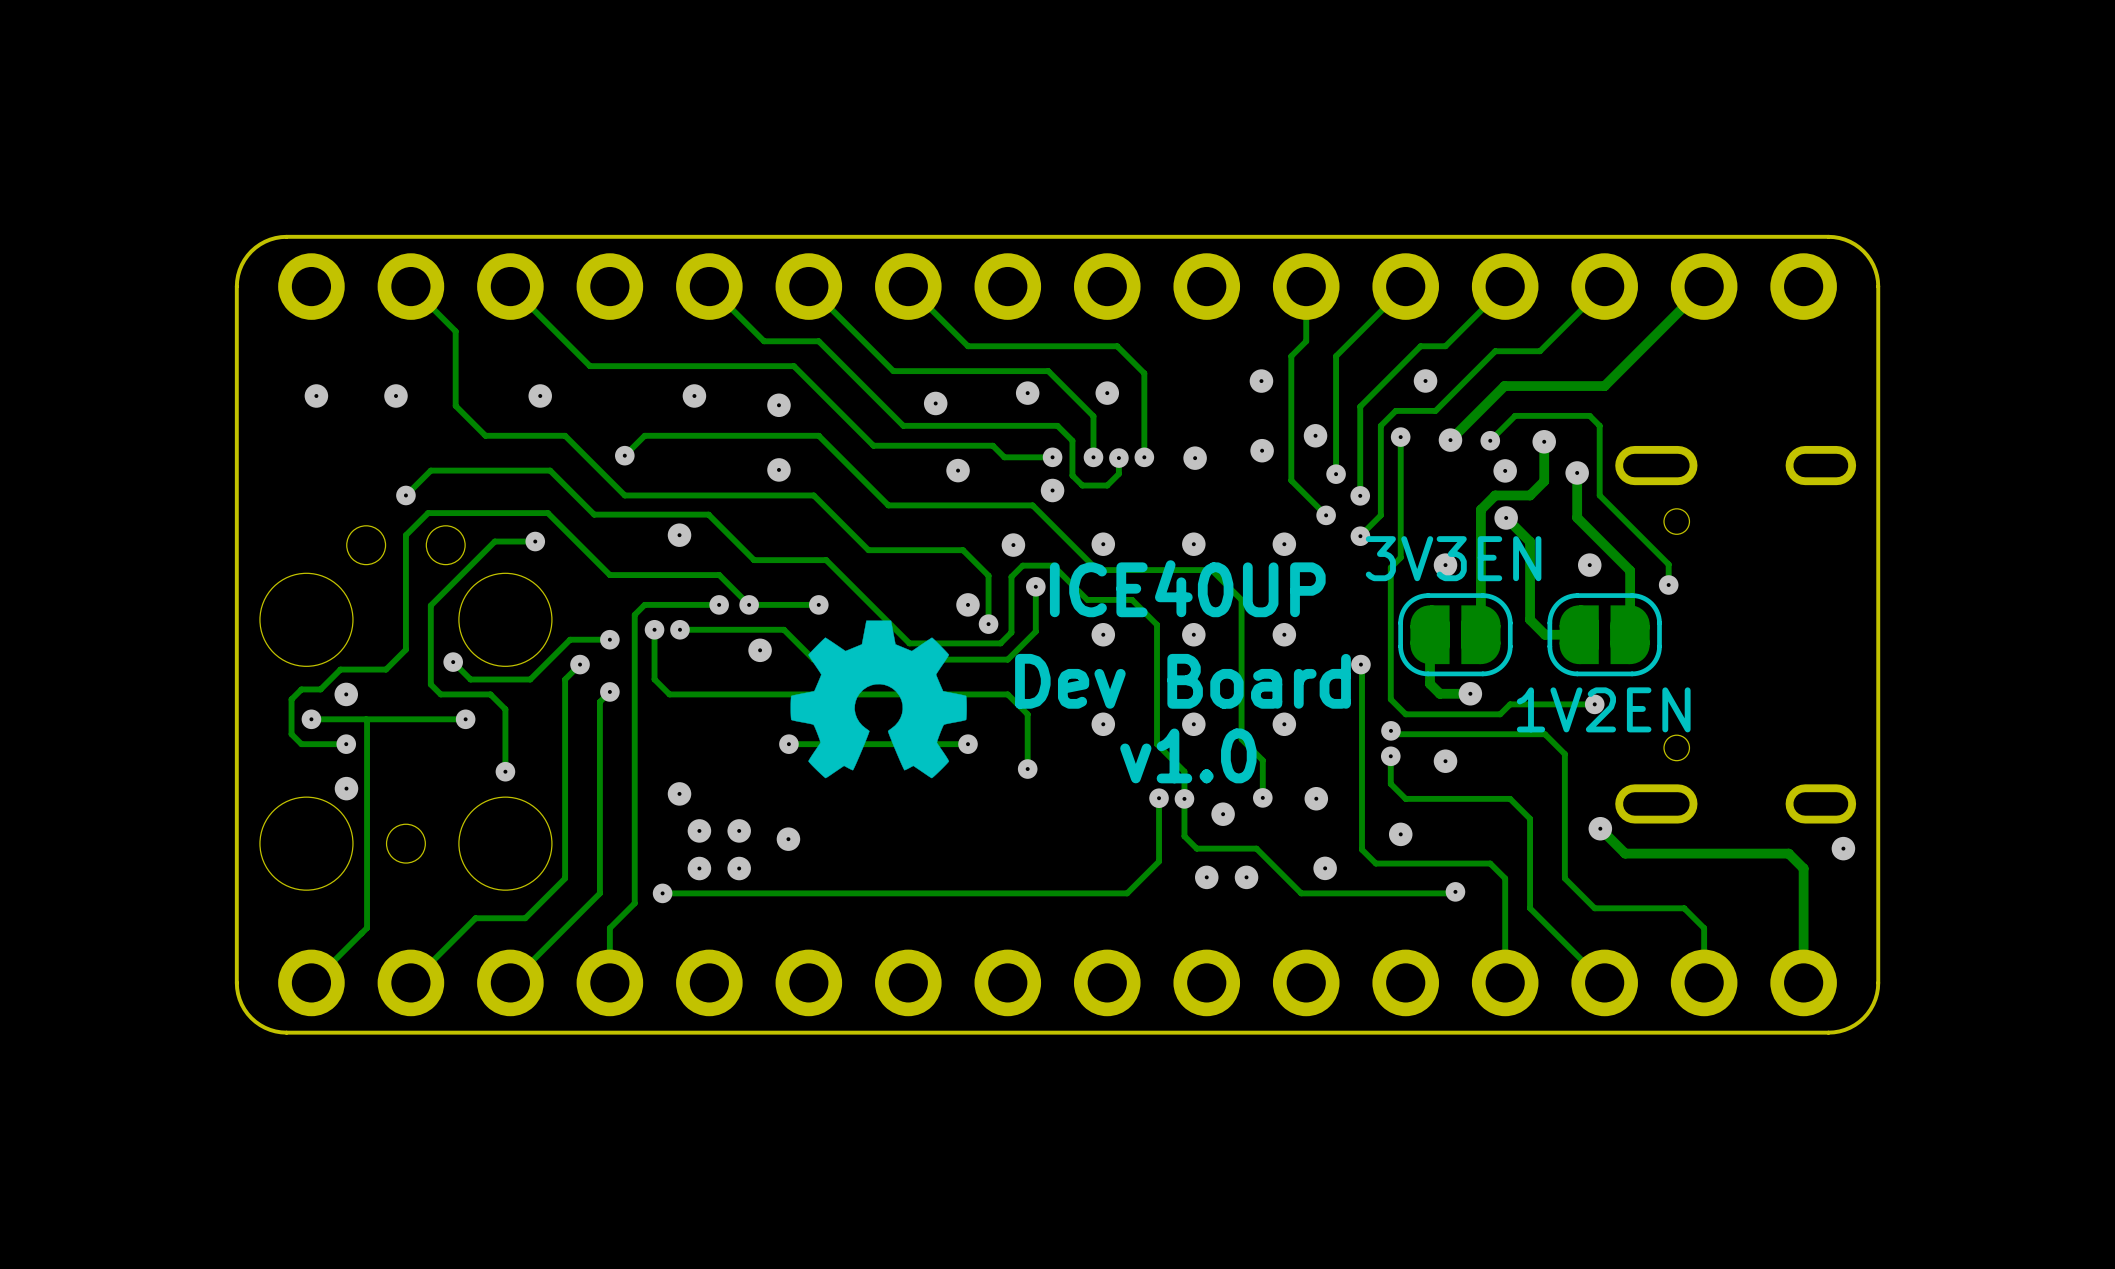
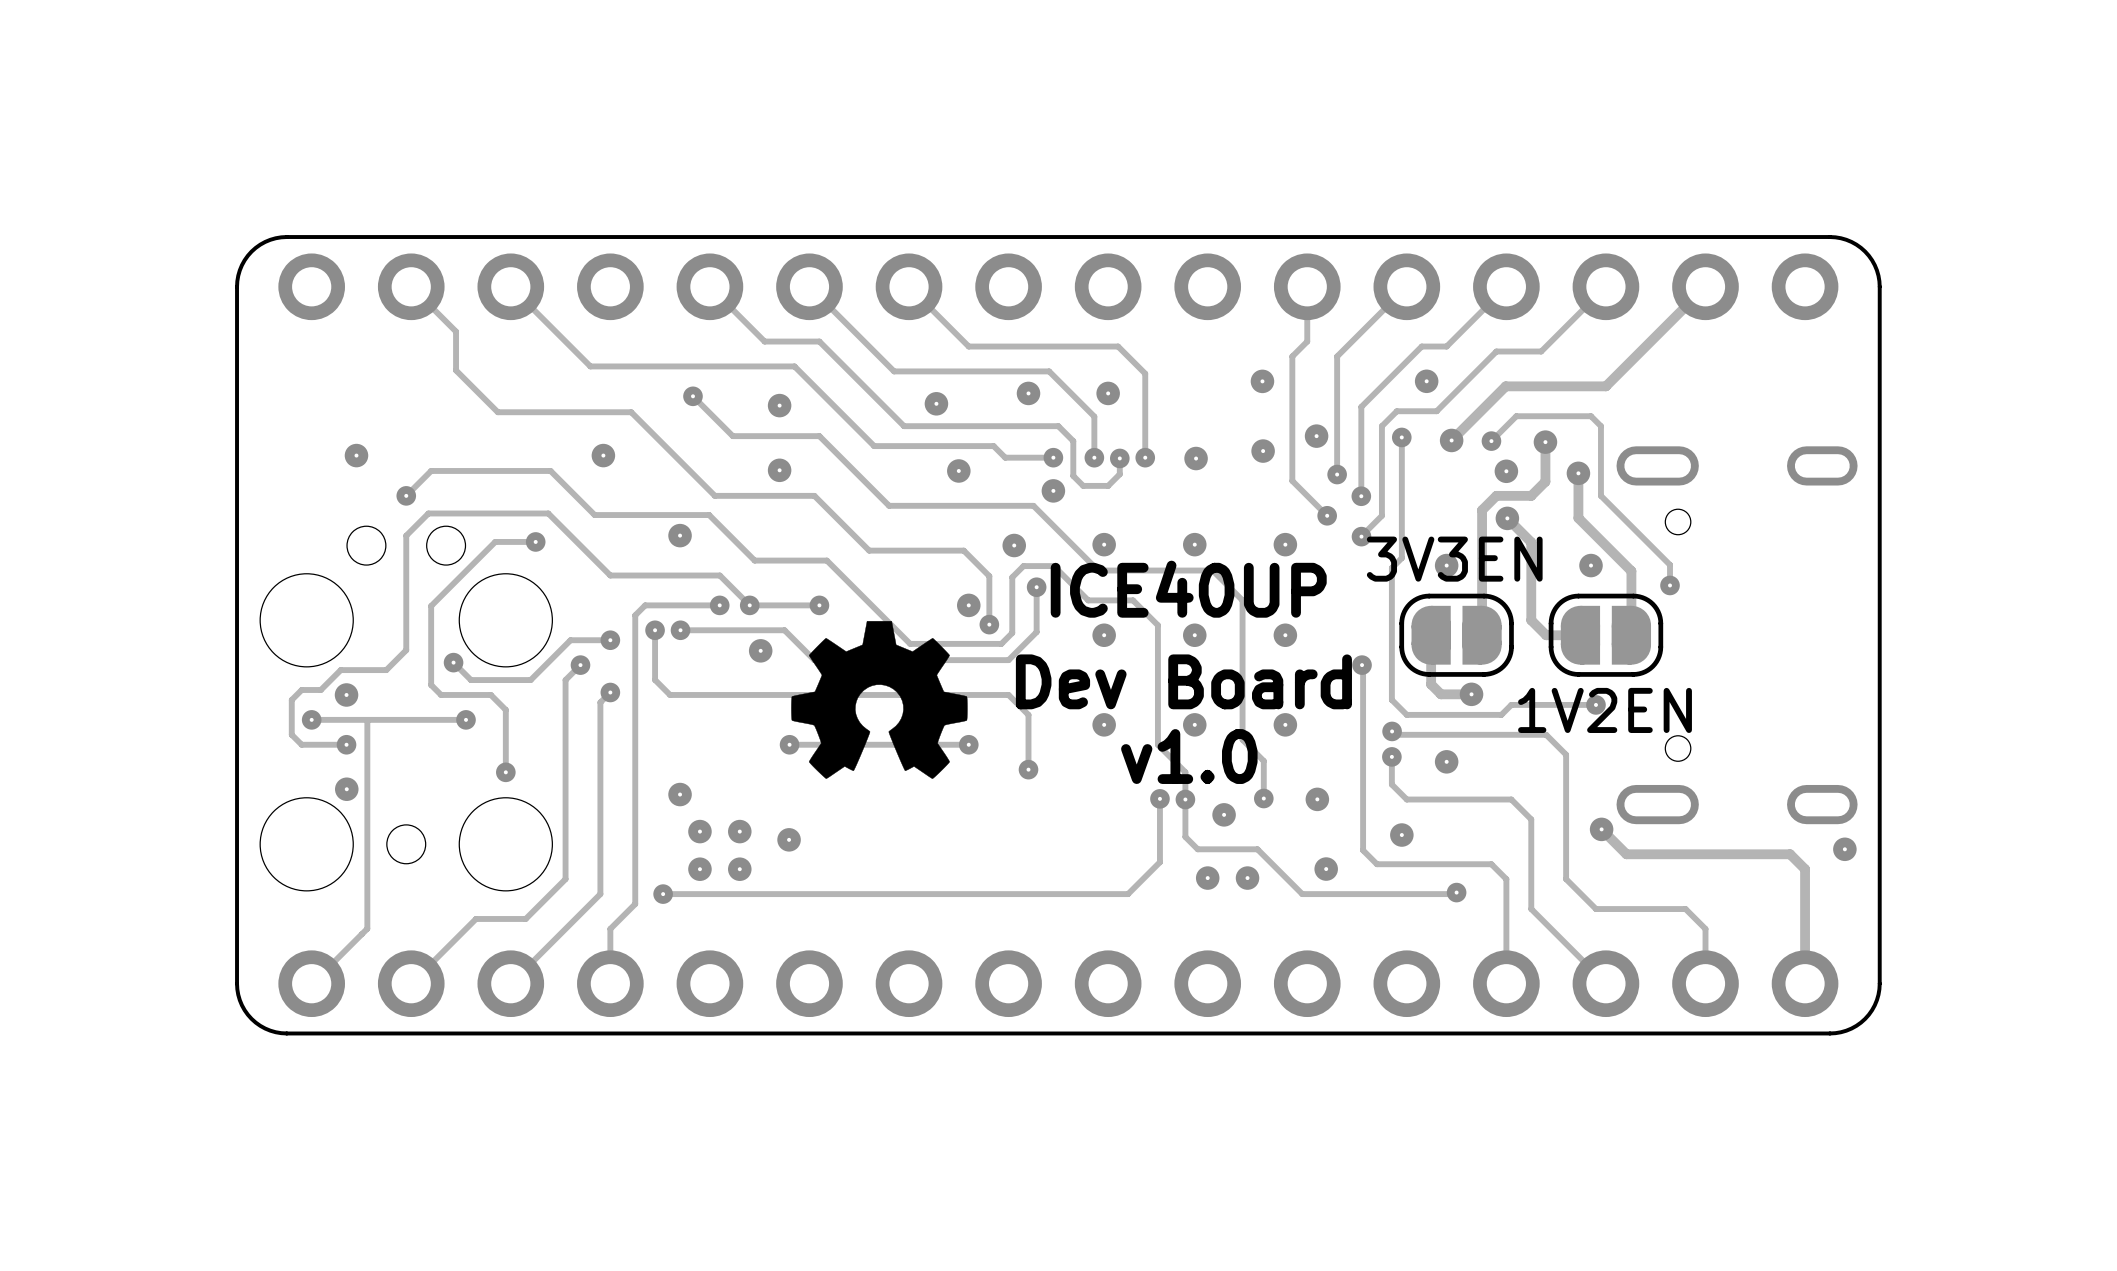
track: (455, 370) (455, 405) (485, 435) (565, 435) (624, 495) (714, 495) -> (456, 370) (497, 412) (631, 412) (714, 495)
via: (316, 395) -> none
via: (395, 395) -> none
via: (540, 395) -> none
via: (694, 395) -> none
track: (732, 435) (644, 435) (624, 455) -> (732, 436) (692, 396)
via: none -> (356, 455)
via: none -> (603, 455)
via position: (624, 455) -> (692, 396)

